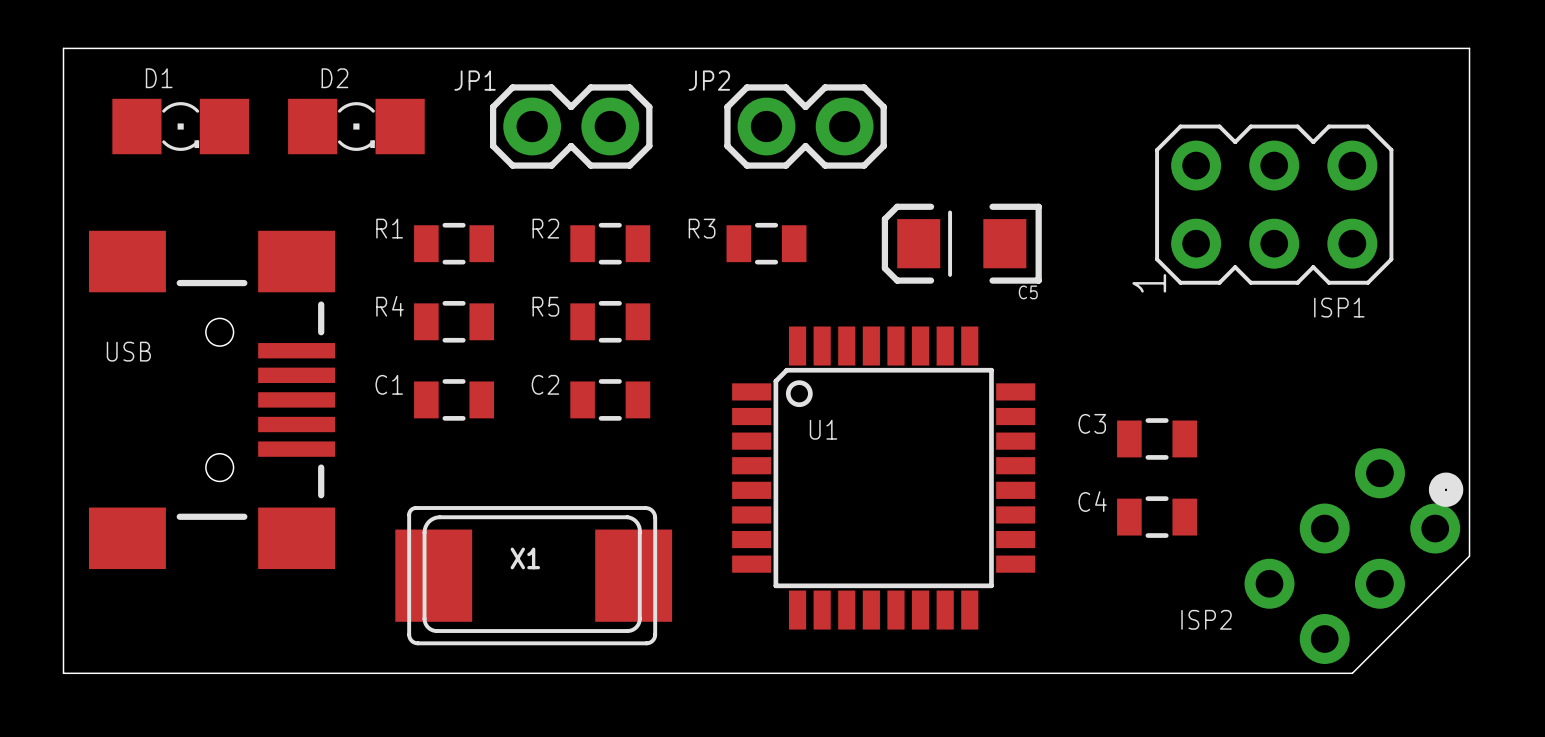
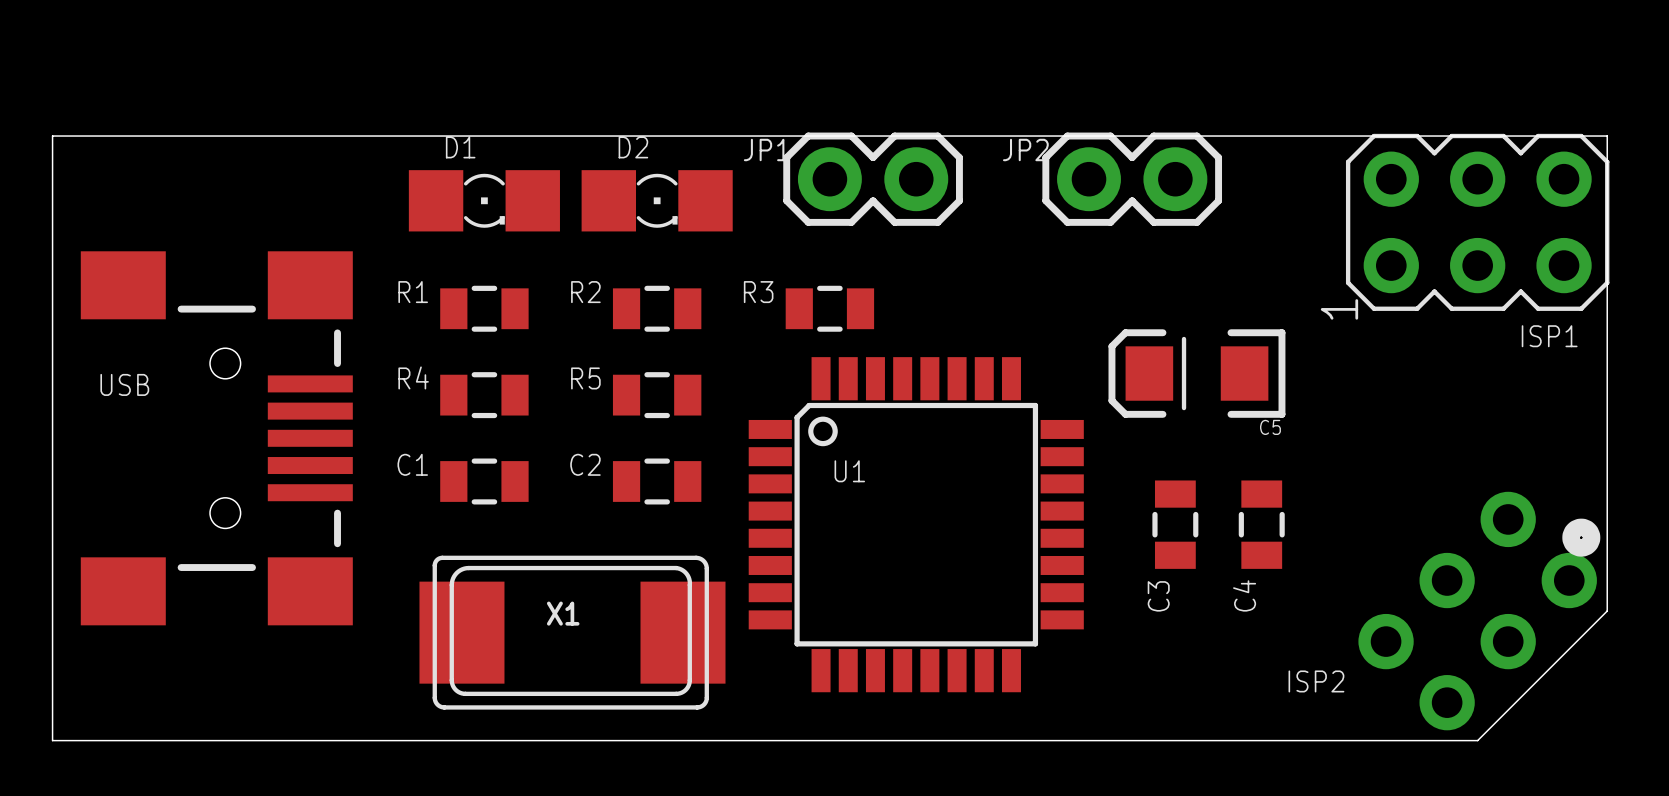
JP1 name position: JP1 (475, 80) -> JP1 (766, 150)
JP2 name position: JP2 (709, 80) -> JP2 (1025, 150)
board edge: (63, 126) (63, 48) (1469, 48) (1469, 126) -> (52, 136) (1607, 136)
D1 position: (180, 126) -> (484, 200)
D2 position: (356, 126) -> (657, 200)
JP1 position: (571, 126) -> (873, 179)
JP2 position: (805, 126) -> (1132, 179)
ISP1 position: (1274, 204) -> (1477, 222)
R1 position: (454, 243) -> (484, 308)
R2 position: (610, 243) -> (657, 308)
R3 position: (766, 243) -> (829, 308)
C5 position: (961, 243) -> (1196, 373)
R4 position: (454, 321) -> (484, 395)
R5 position: (610, 321) -> (657, 395)
C1 position: (454, 399) -> (484, 481)
C2 position: (610, 399) -> (657, 481)
C3 name position: C3 (1092, 423) -> C3 (1158, 596)
C3 rotation: 0° (1157, 438) -> 90° clockwise (1175, 524)
C3 position: (1157, 438) -> (1175, 524)
U1 position: (883, 478) -> (916, 524)
C4 name position: C4 (1092, 501) -> C4 (1244, 595)
C4 rotation: 0° (1157, 517) -> 90° clockwise (1261, 524)

